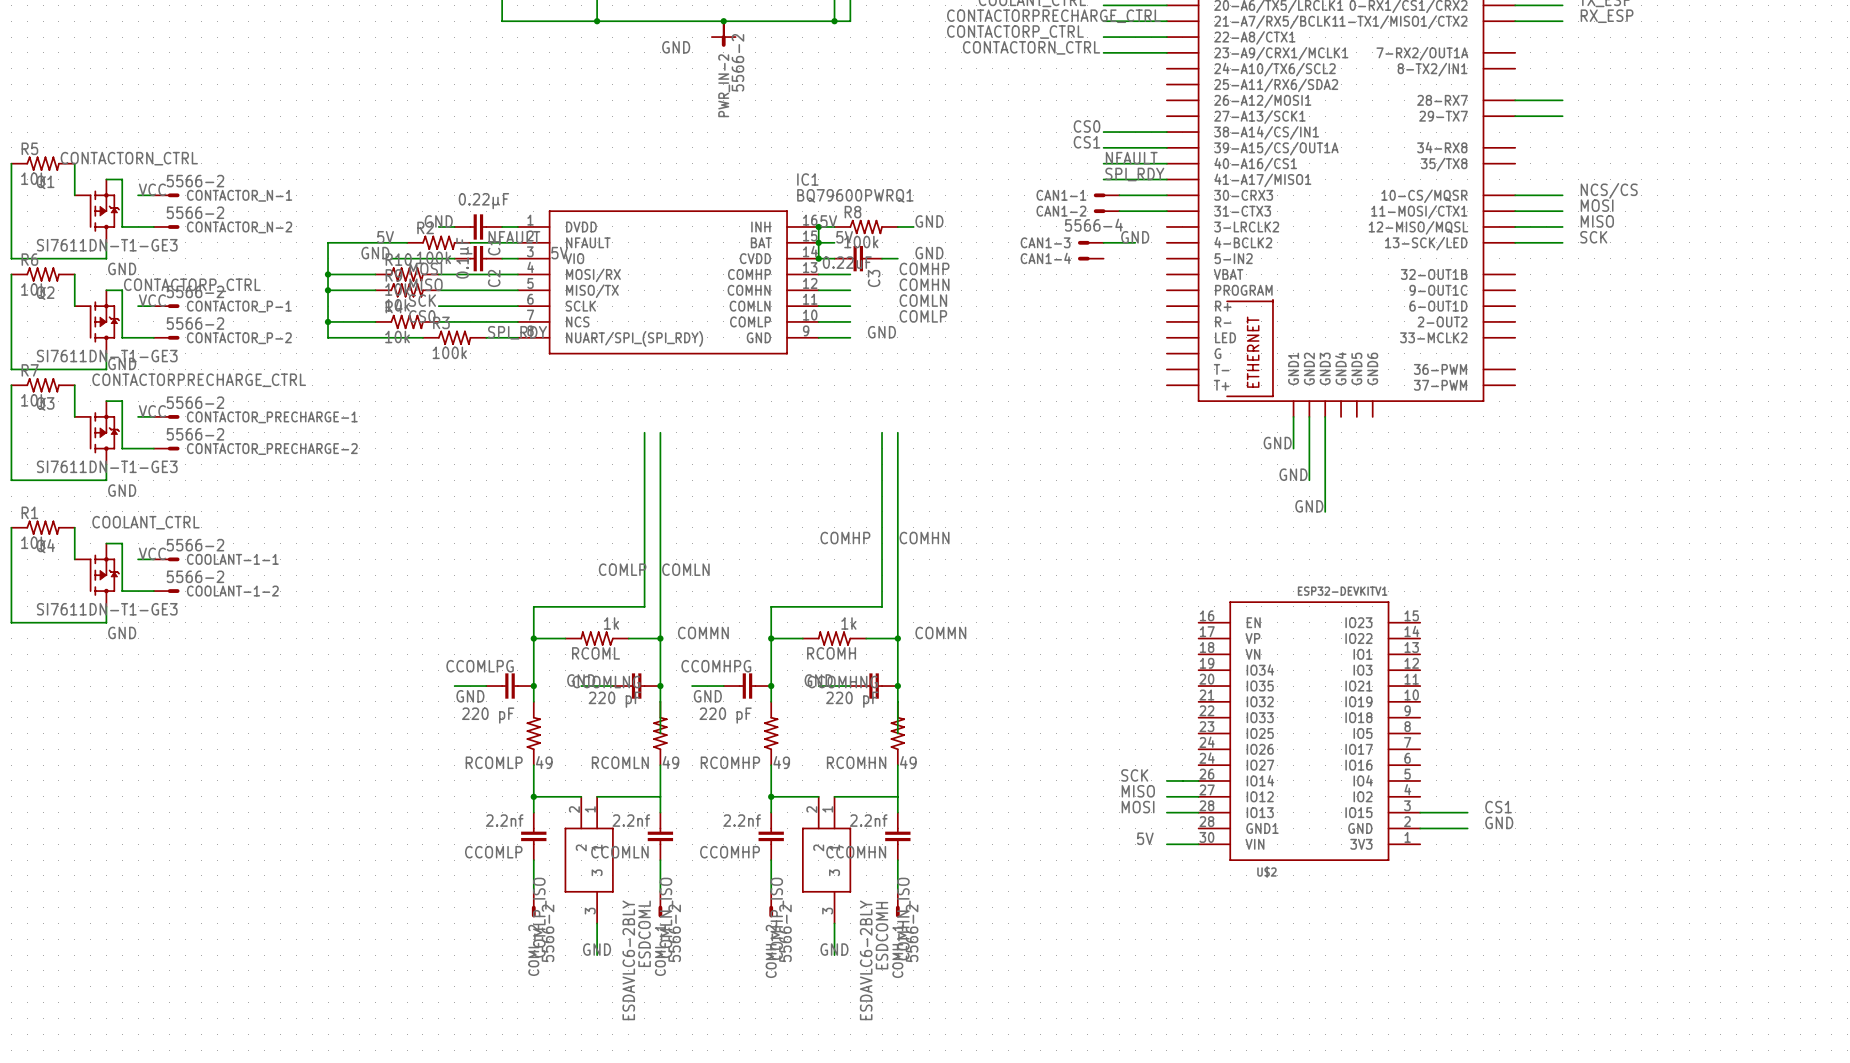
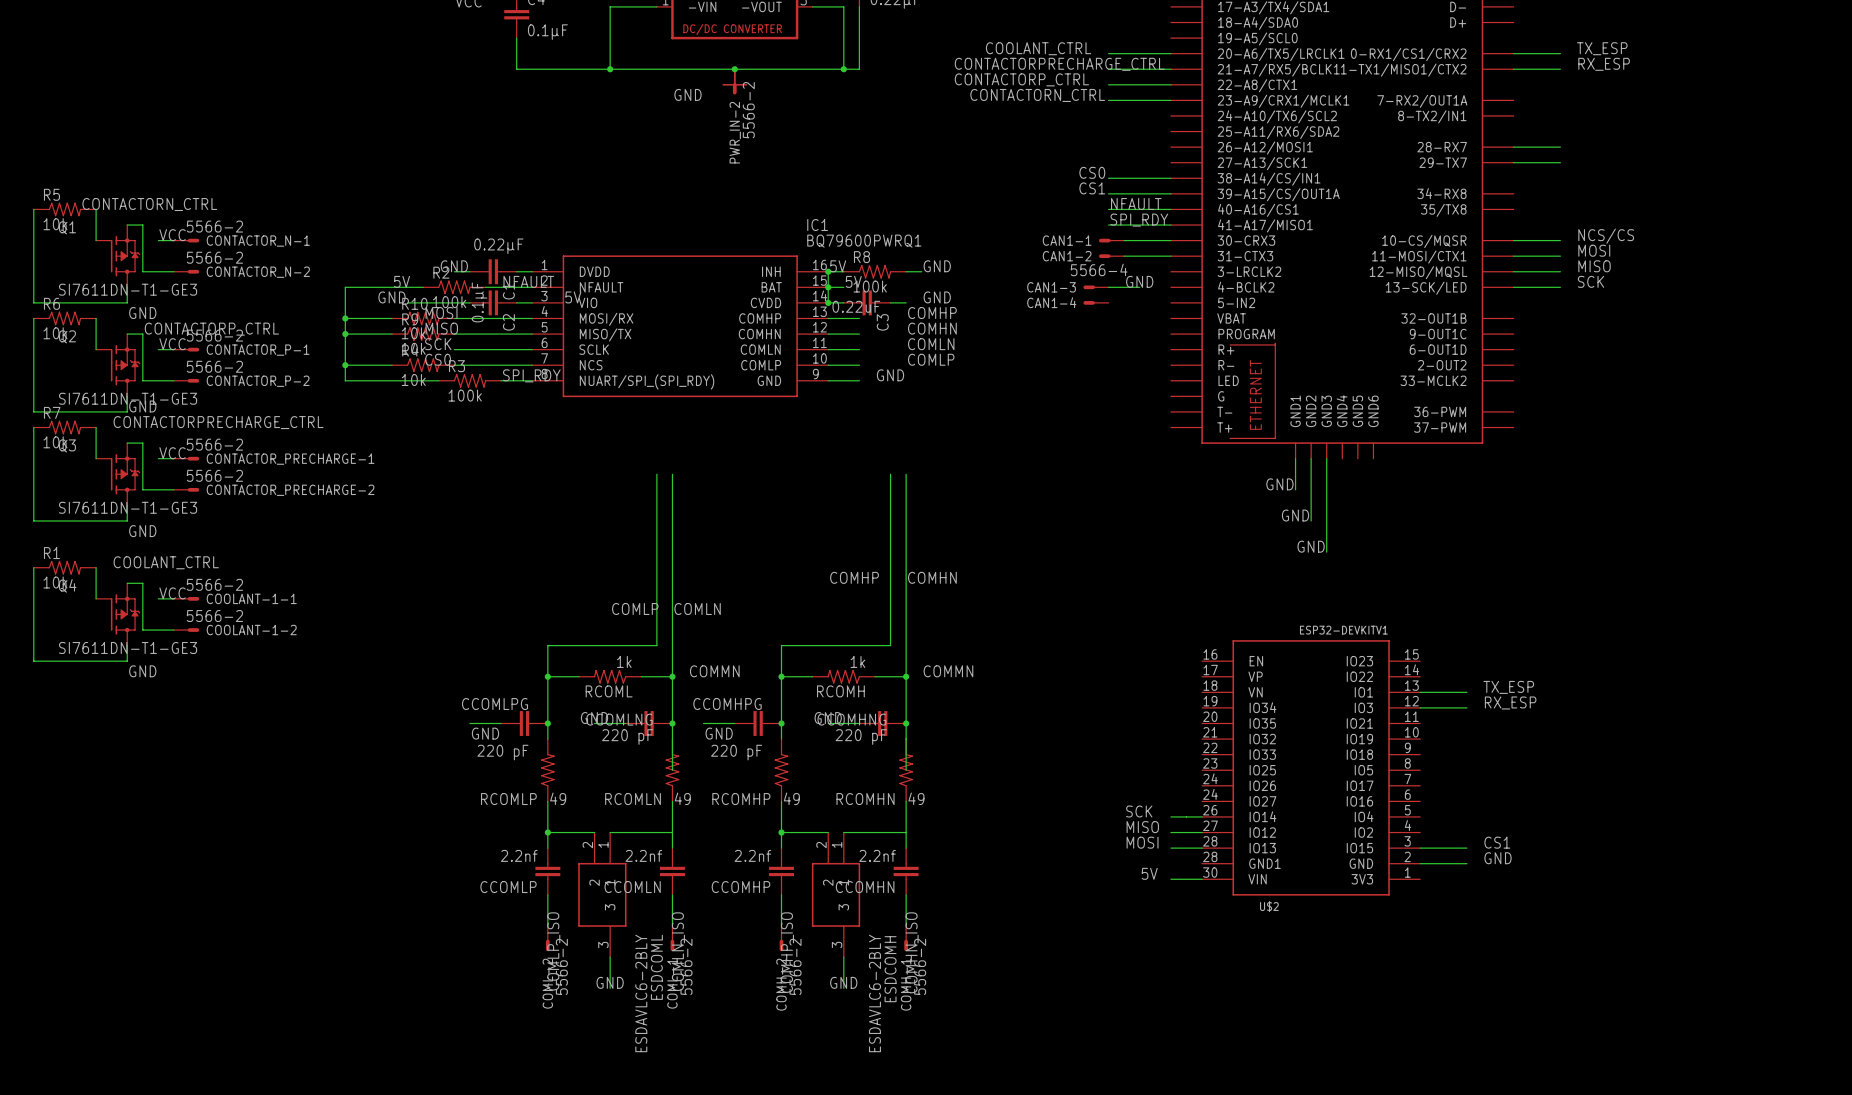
label: none -> TX_ESP (1508, 687)
wire: none -> (1420, 692) (1466, 692)
label: none -> RX_ESP (1510, 702)
wire: none -> (1420, 707) (1466, 707)

